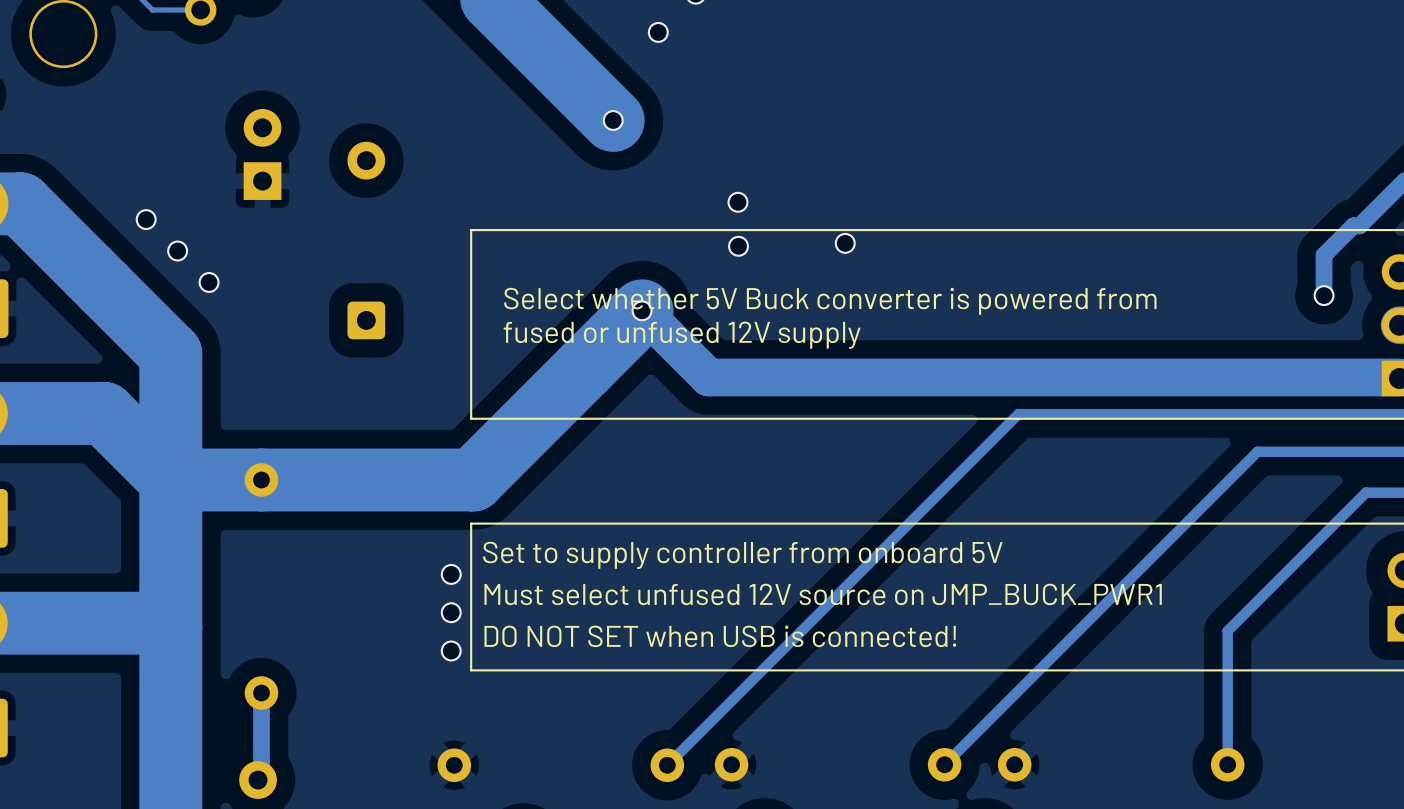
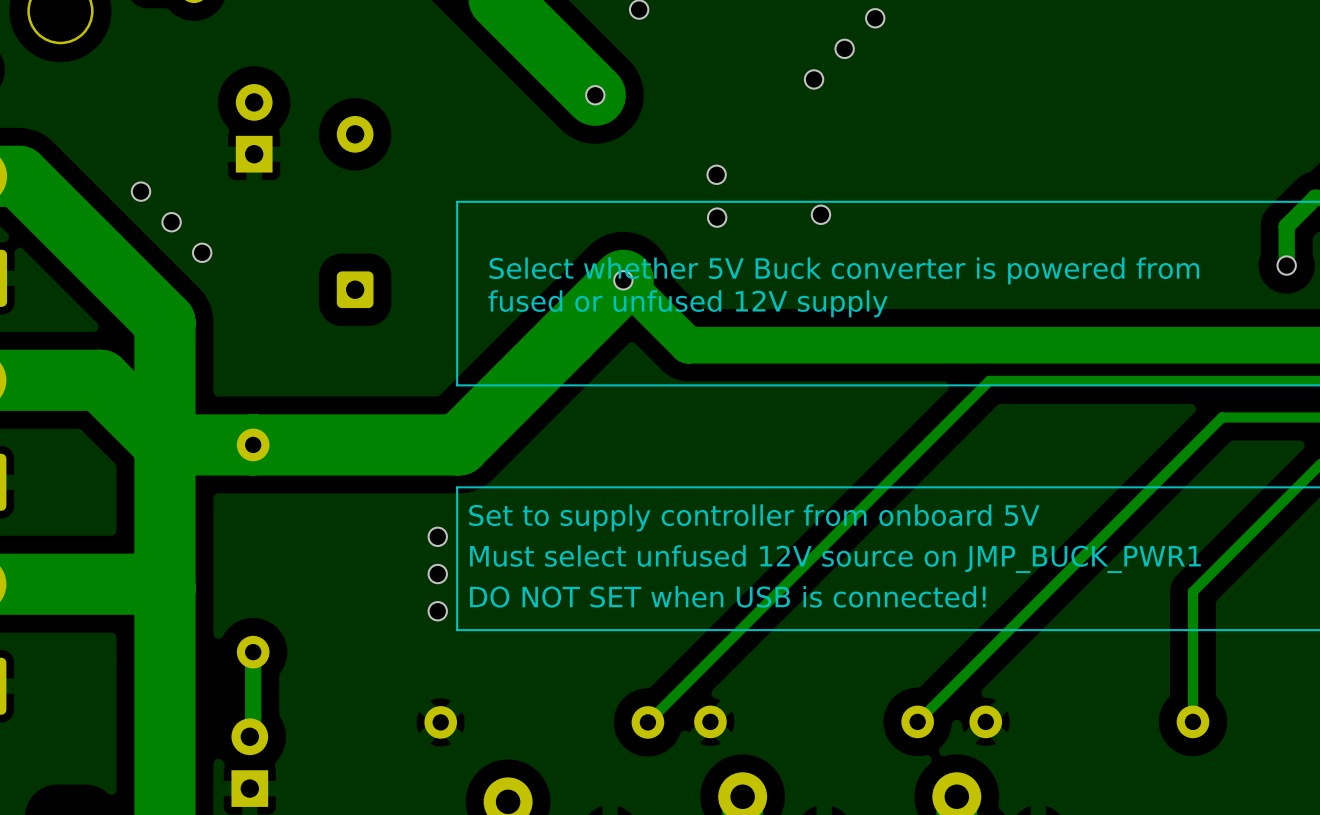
via: none -> (875, 18)
via: none -> (844, 48)
via: none -> (814, 79)

